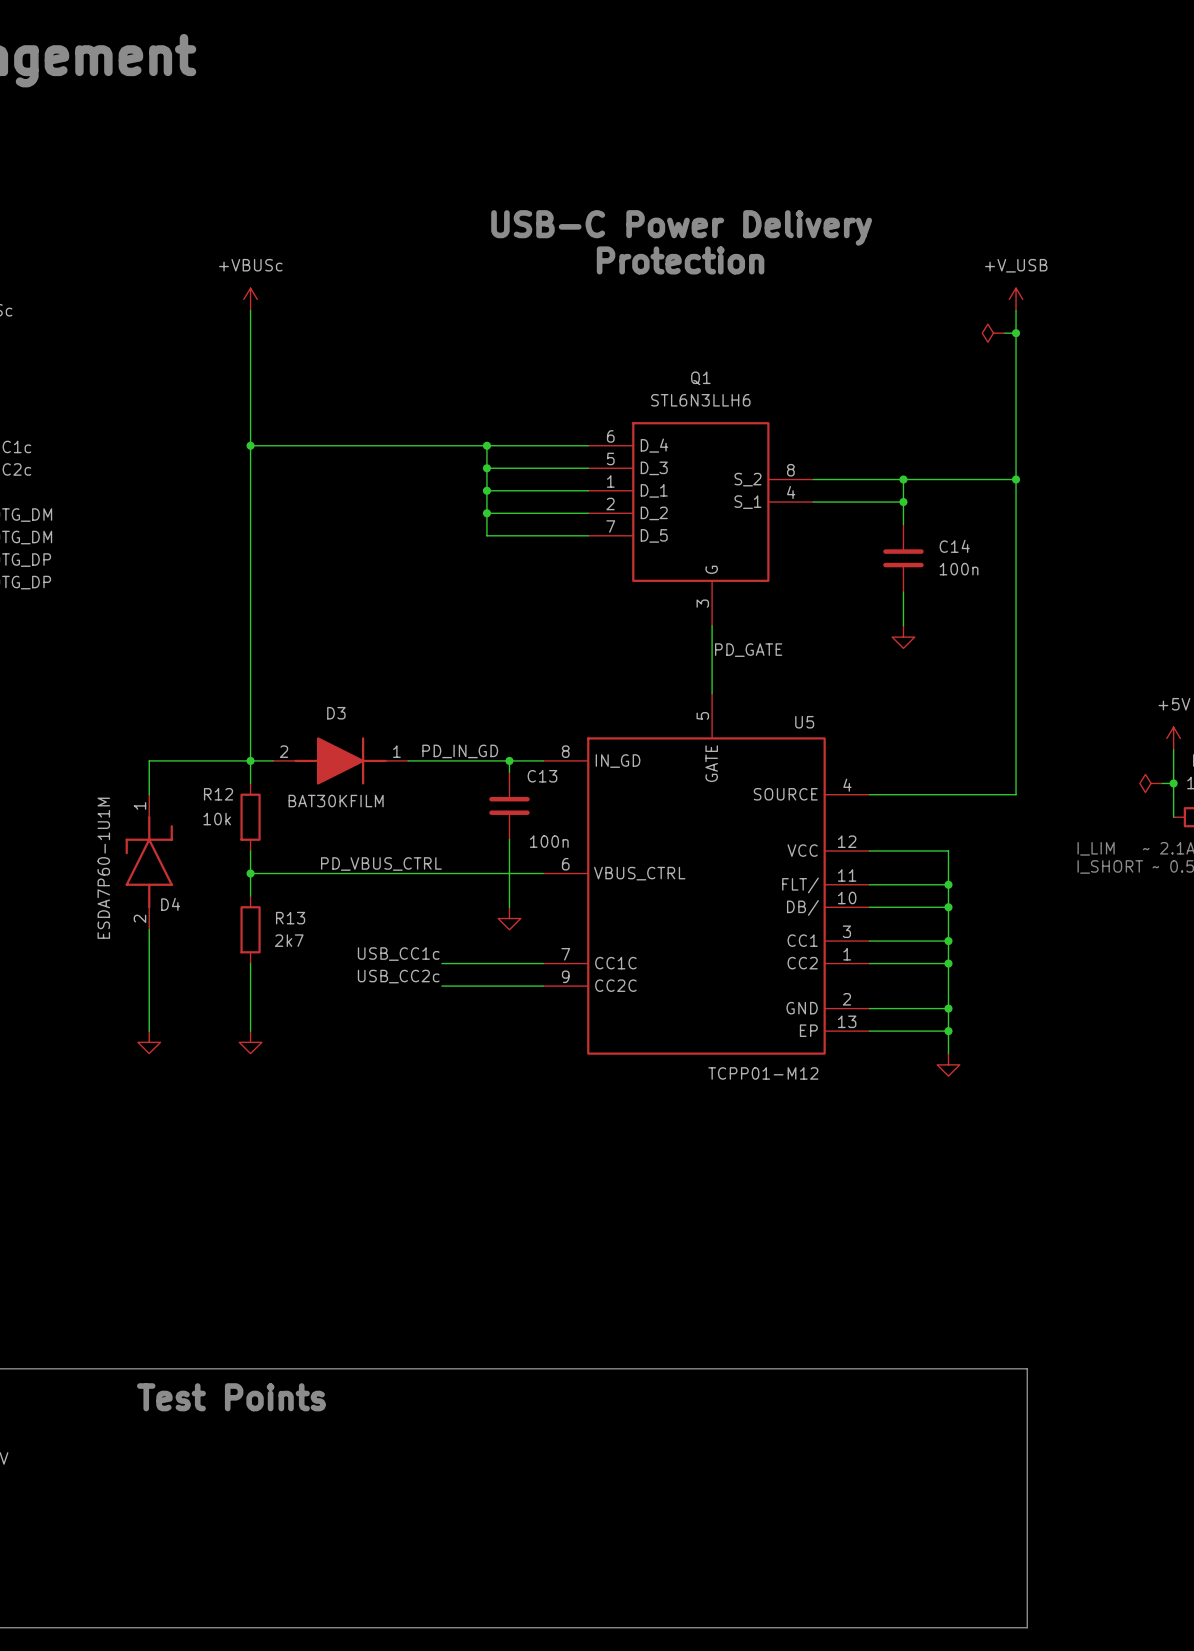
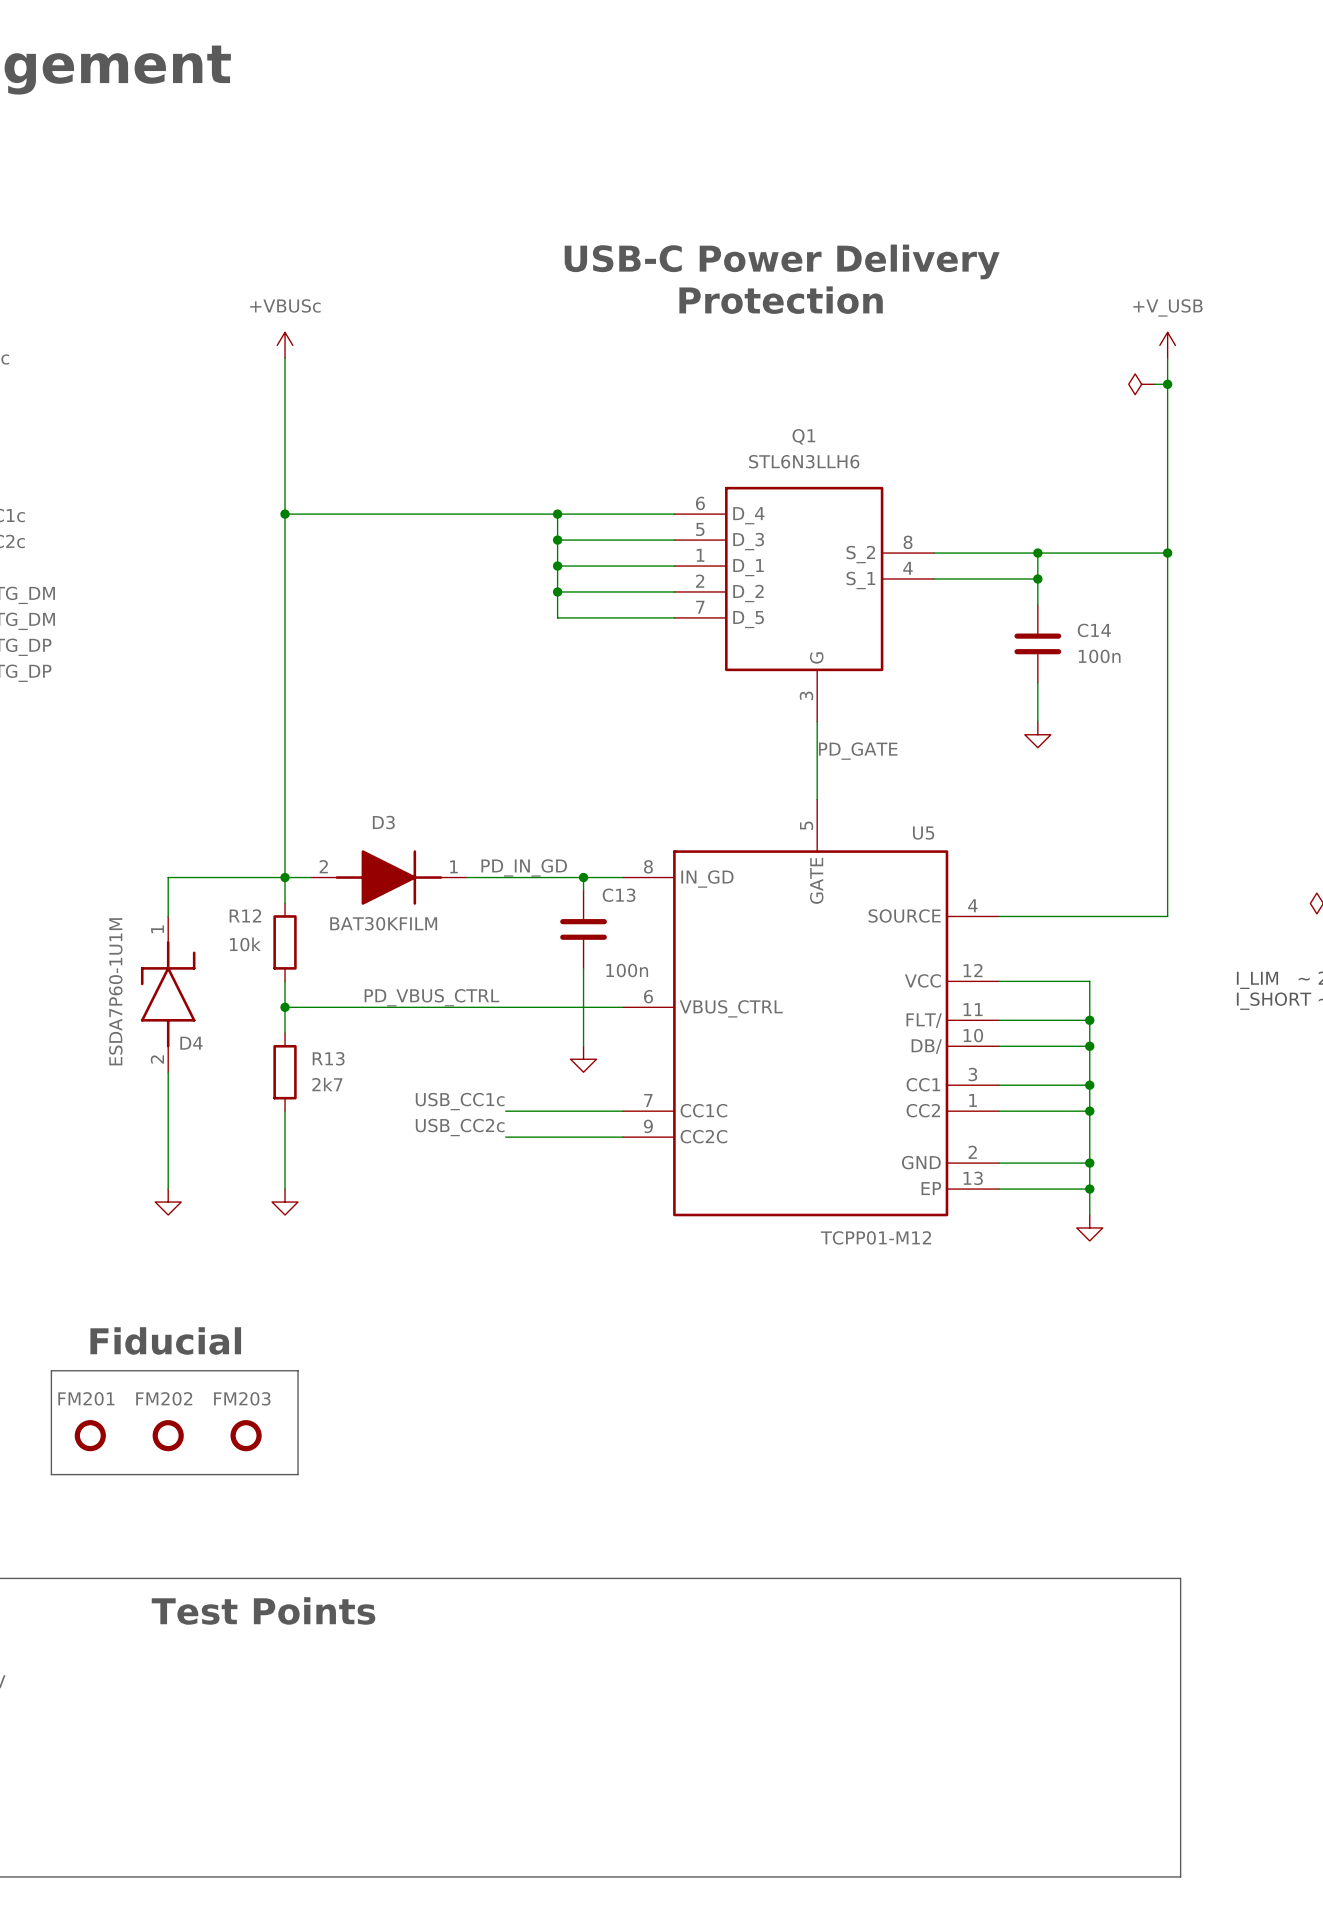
text: none -> Fiducial (165, 1340)
line: none -> (51, 1370) (298, 1370) (298, 1474) (51, 1474) (51, 1370)
FM201: none -> (90, 1435)
FM202: none -> (168, 1435)
FM203: none -> (246, 1435)

